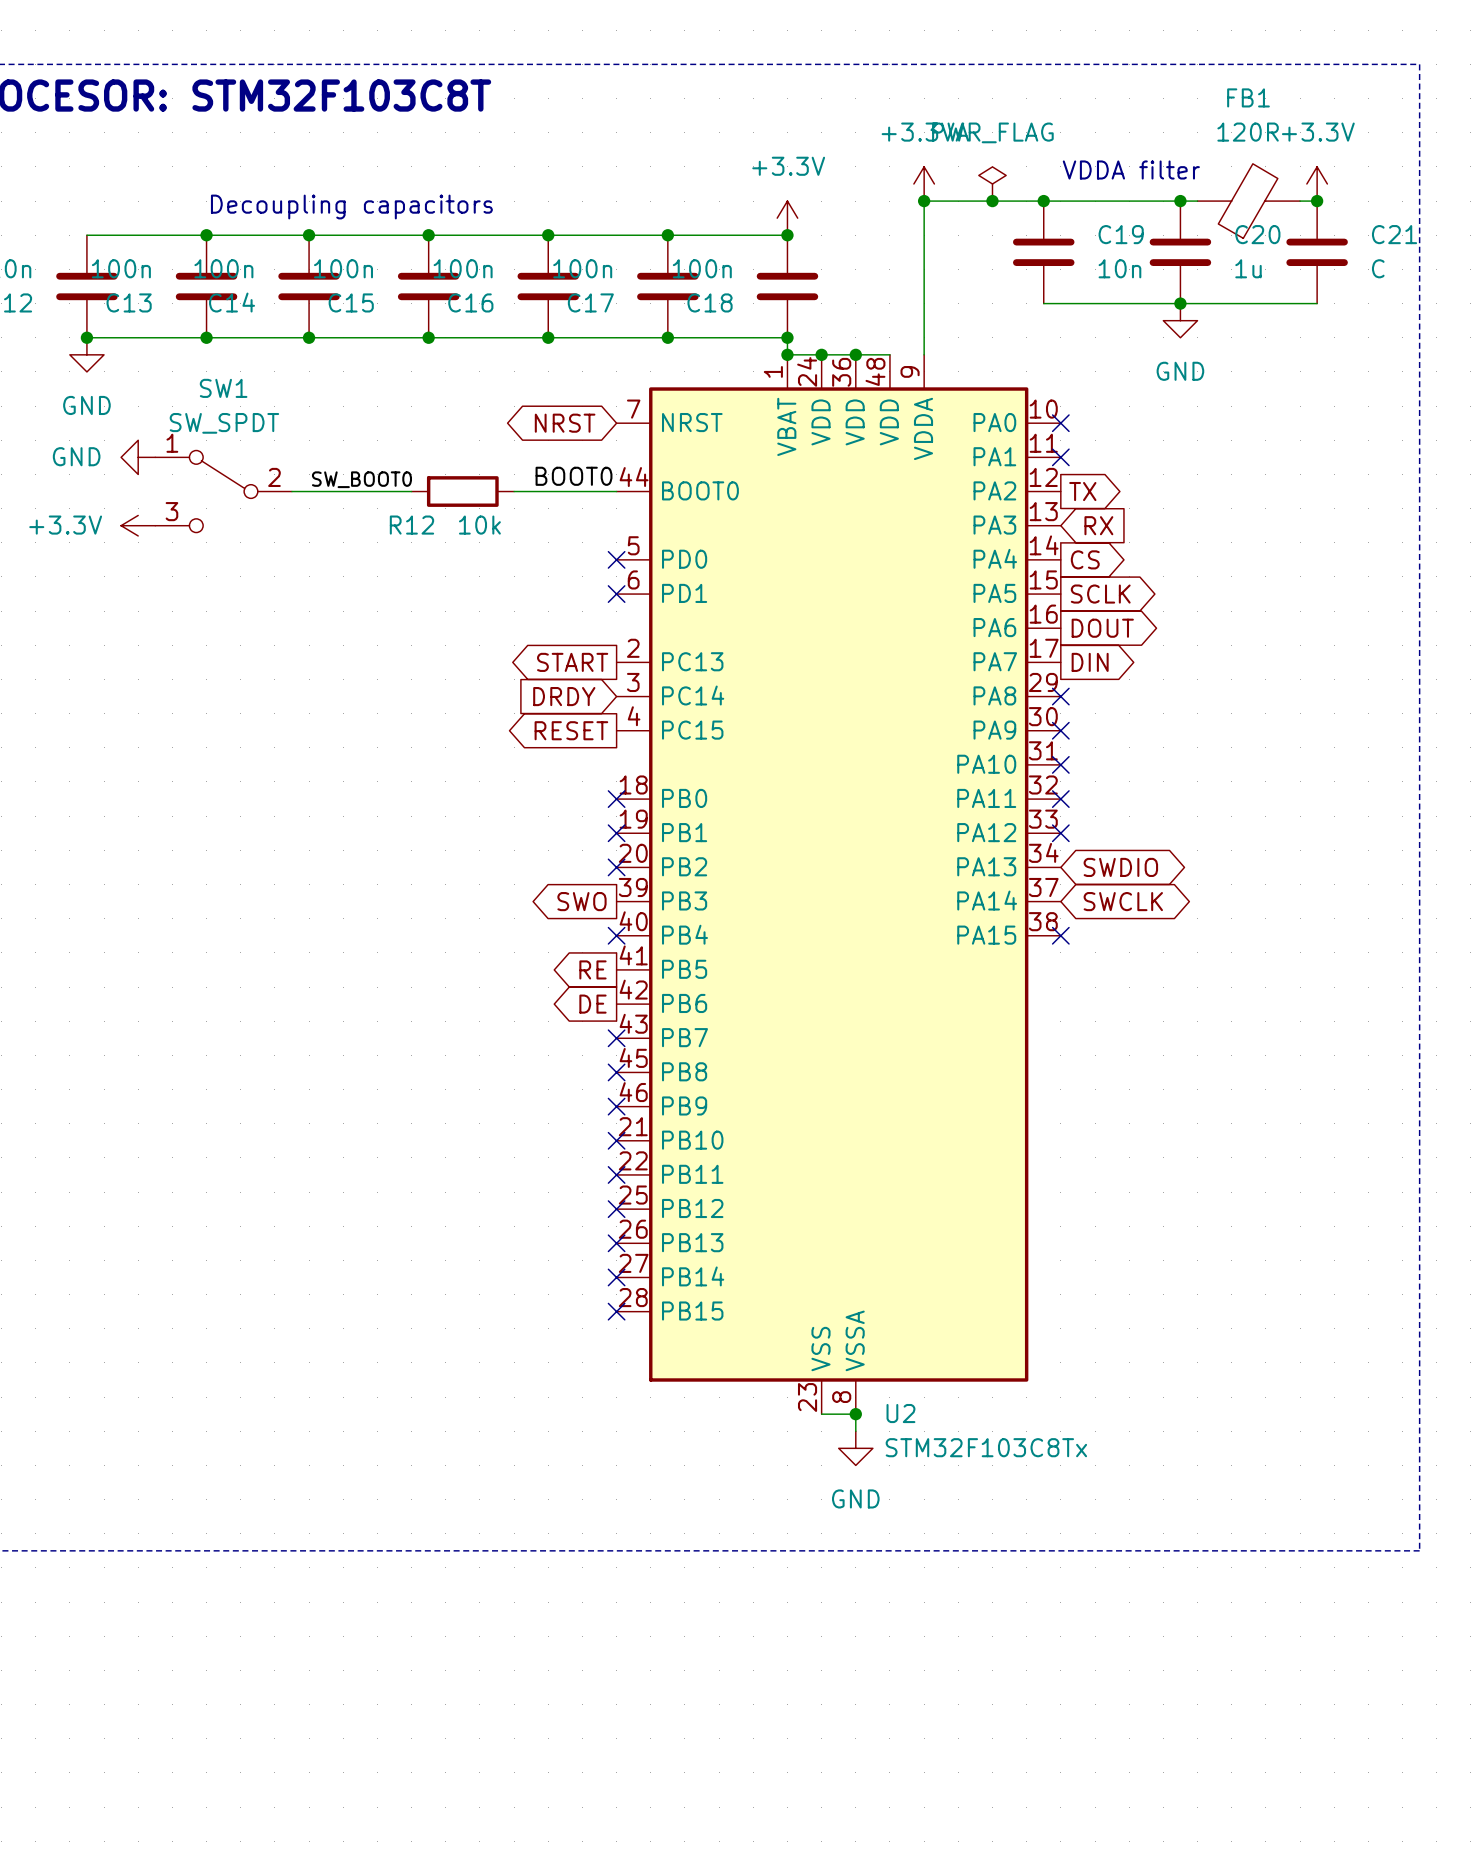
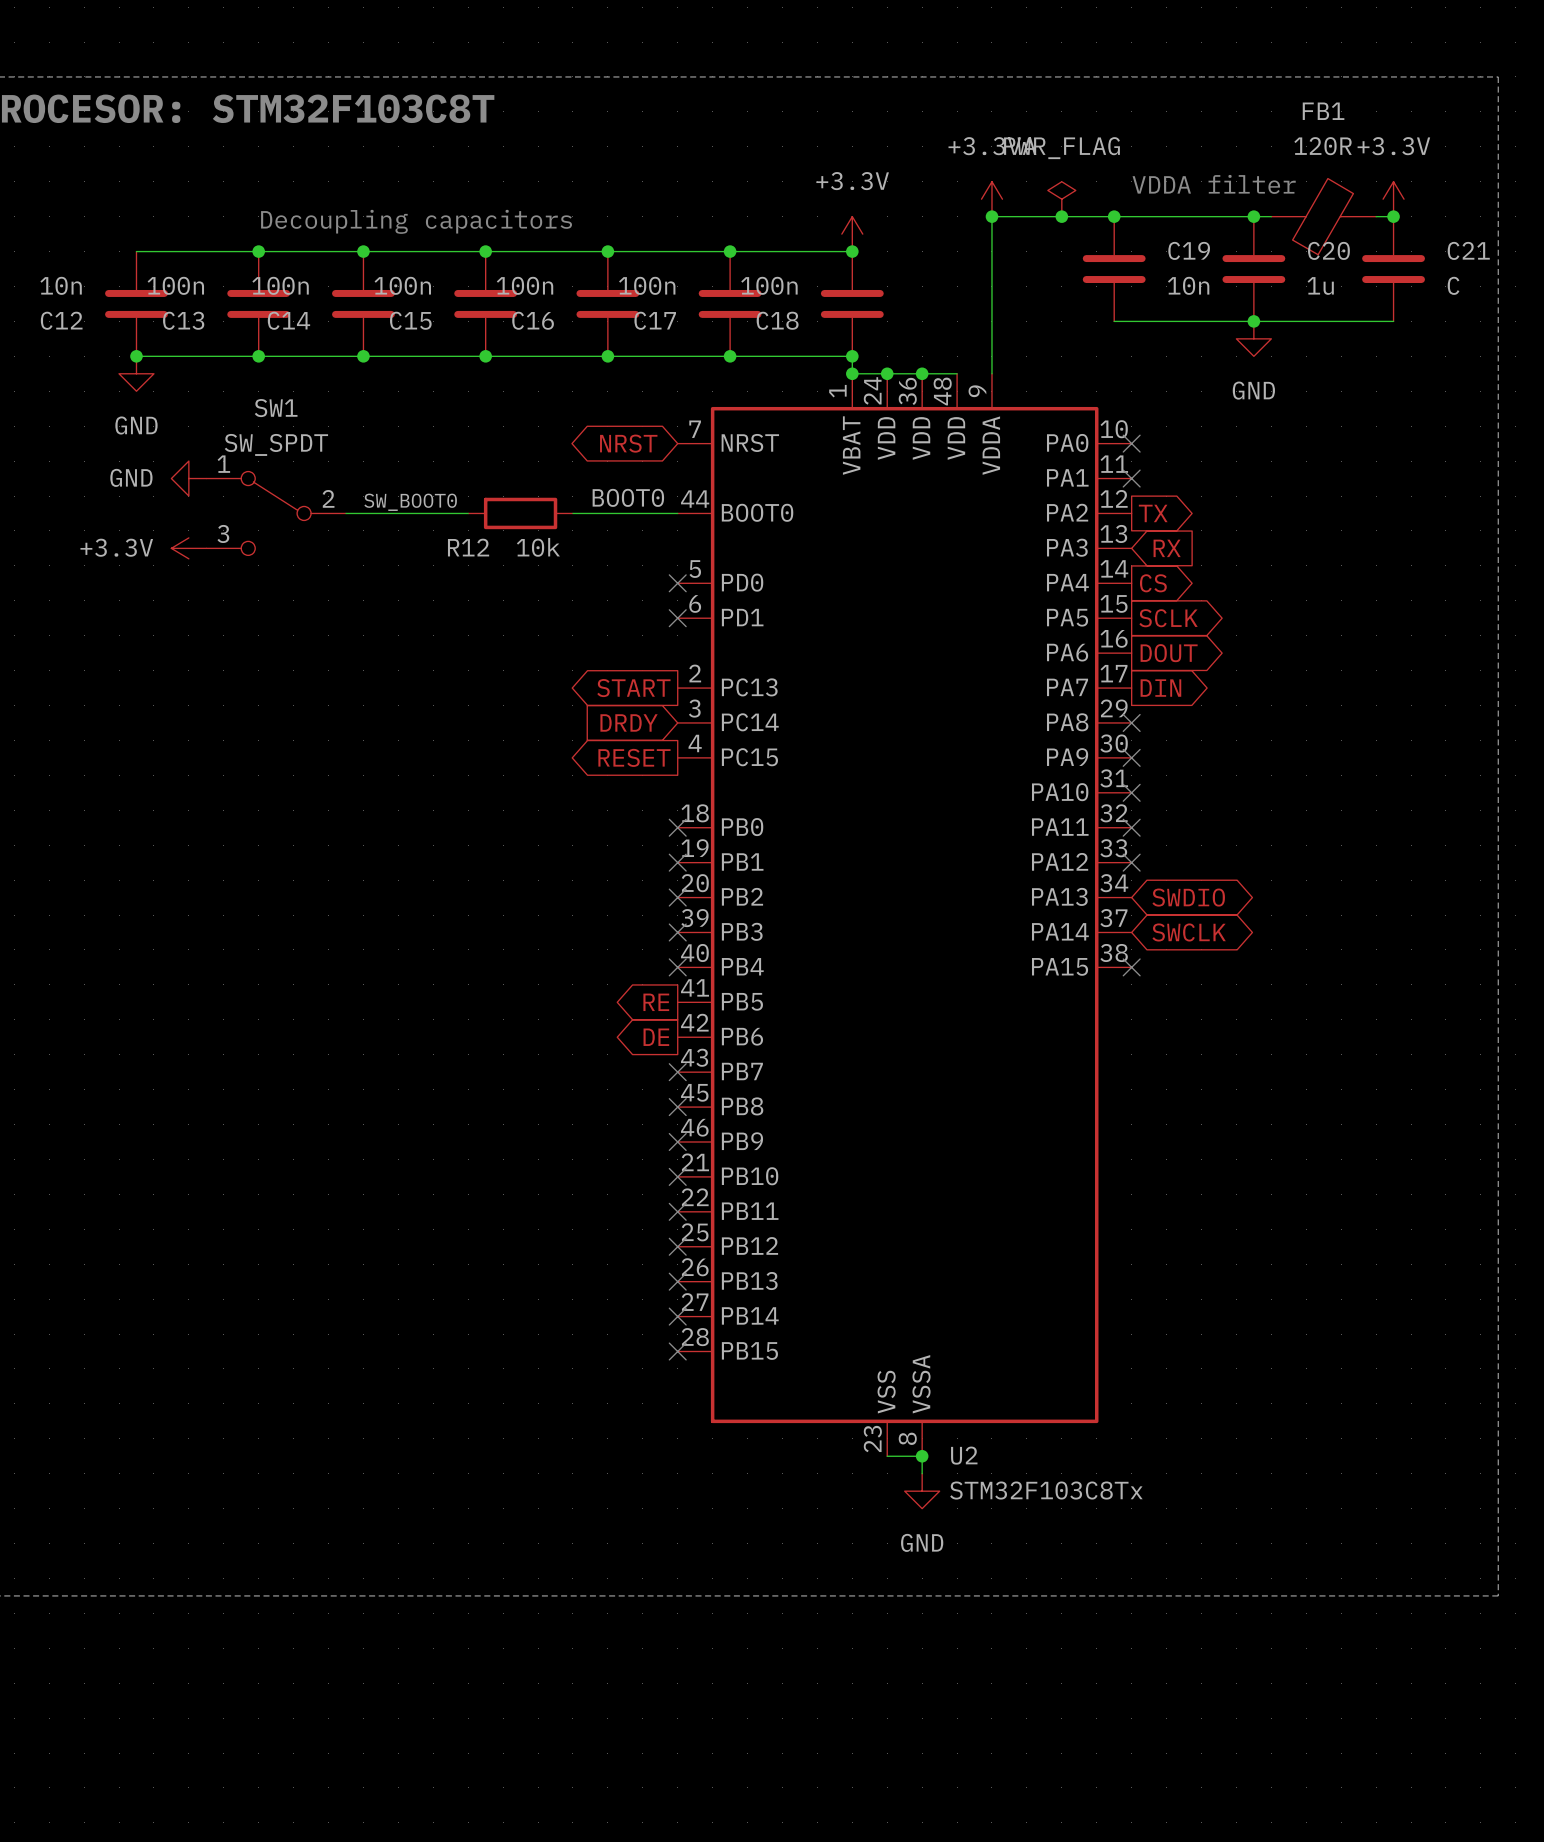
global label: SWO (581, 901) -> none
no-connect mark: none -> (677, 932)

